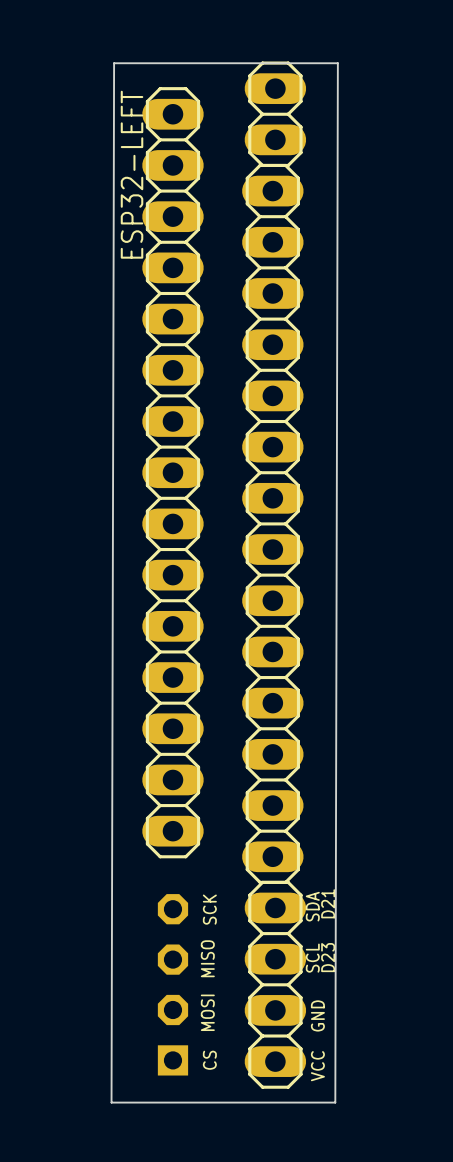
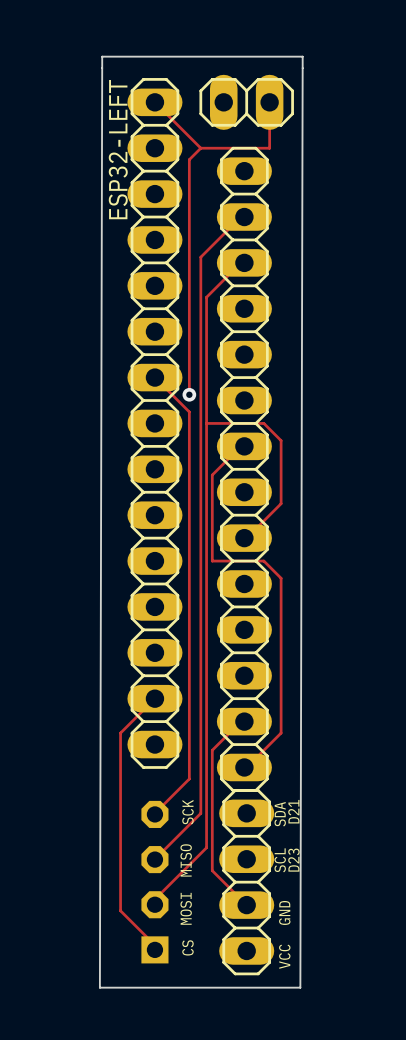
track: none -> (154, 102) (200, 148)
part rotation: 0° (275, 114) -> 90° clockwise (246, 102)
track: none -> (269, 102) (269, 148) (200, 148)
track: none -> (200, 148) (189, 159) (189, 394)
track: none -> (244, 217) (240, 217) (200, 257) (200, 813) (154, 859)
track: none -> (244, 262) (240, 262) (206, 297) (206, 847) (154, 899) (154, 904)
track: none -> (154, 377) (189, 411) (189, 778) (154, 814)
via: none -> (189, 394)
track: none -> (206, 423) (263, 423) (281, 440) (281, 503) (246, 538) (244, 538)
track: none -> (244, 446) (240, 446) (212, 475) (212, 561) (263, 561) (281, 578) (281, 733) (246, 767) (244, 767)
track: none -> (154, 698) (120, 733) (120, 910) (154, 945) (154, 949)
track: none -> (244, 721) (240, 721) (212, 750) (212, 870) (246, 905)

